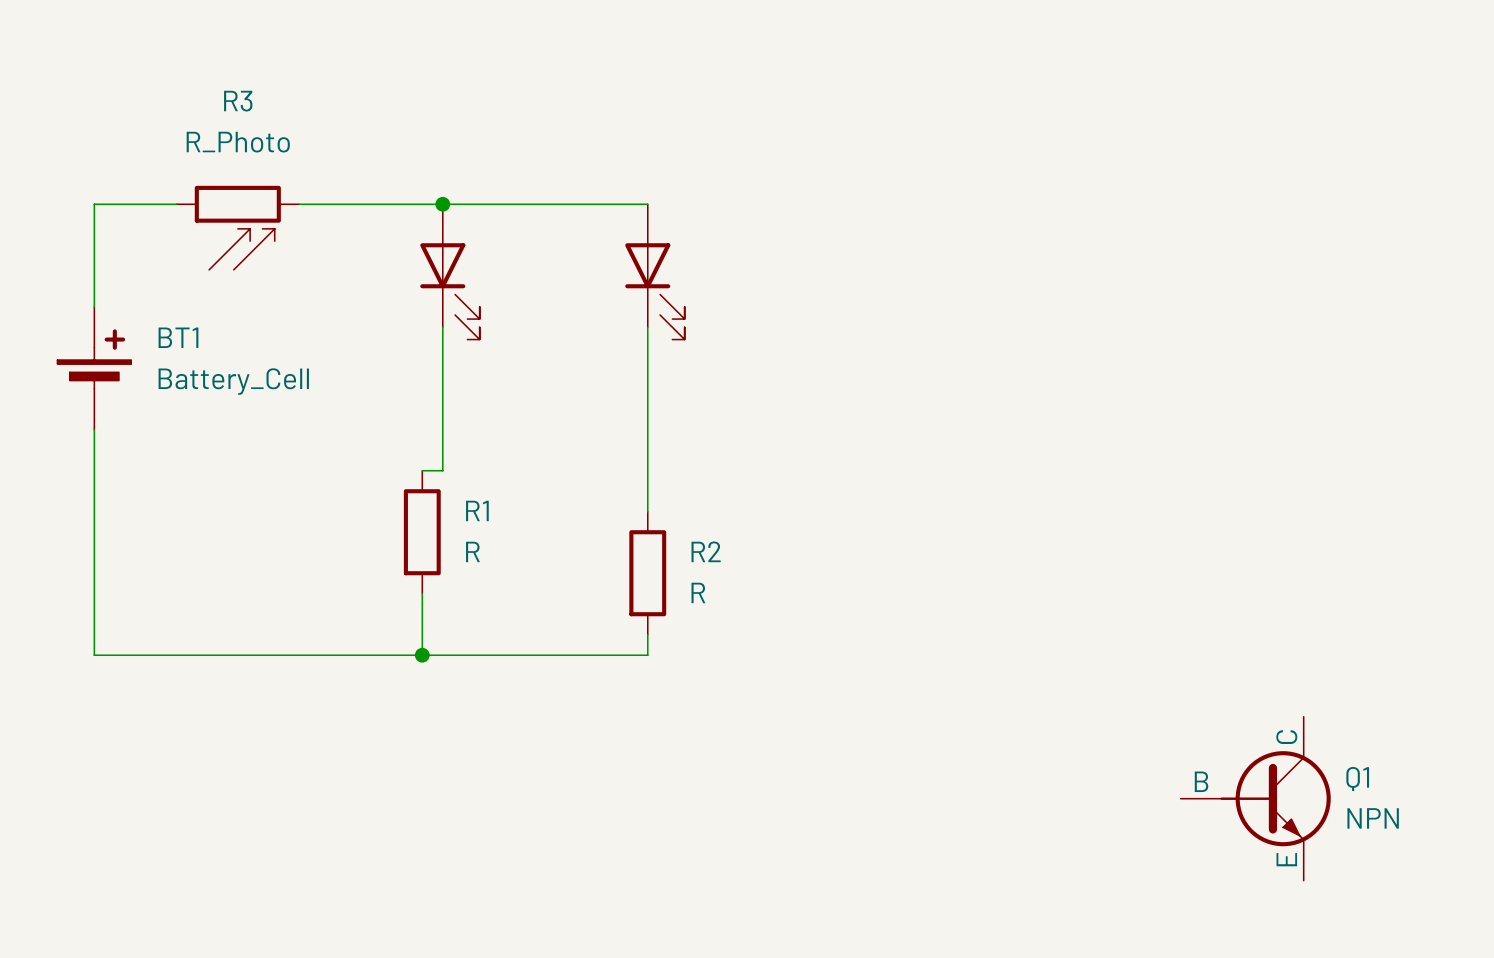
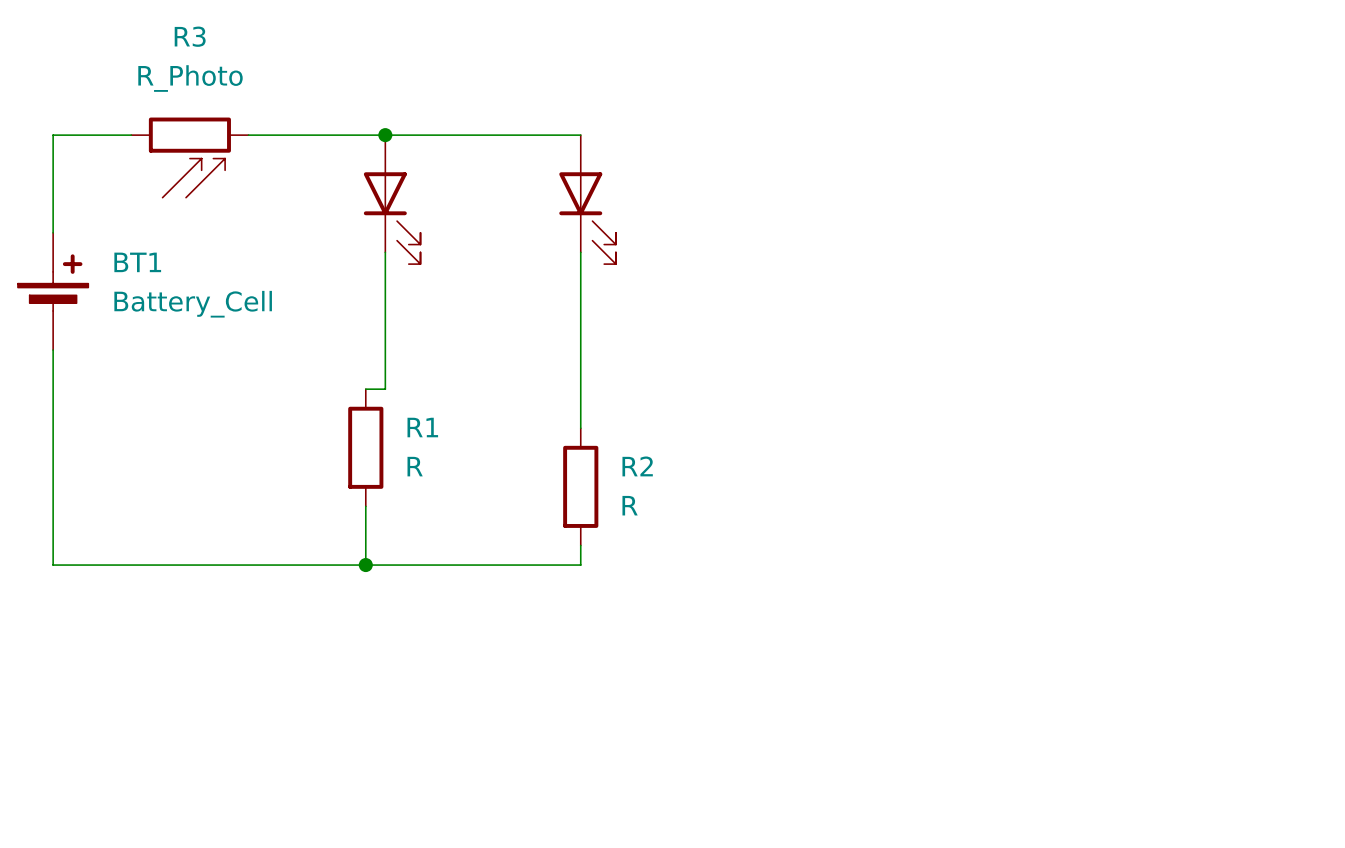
Q1: NPN (1255, 798) -> none

